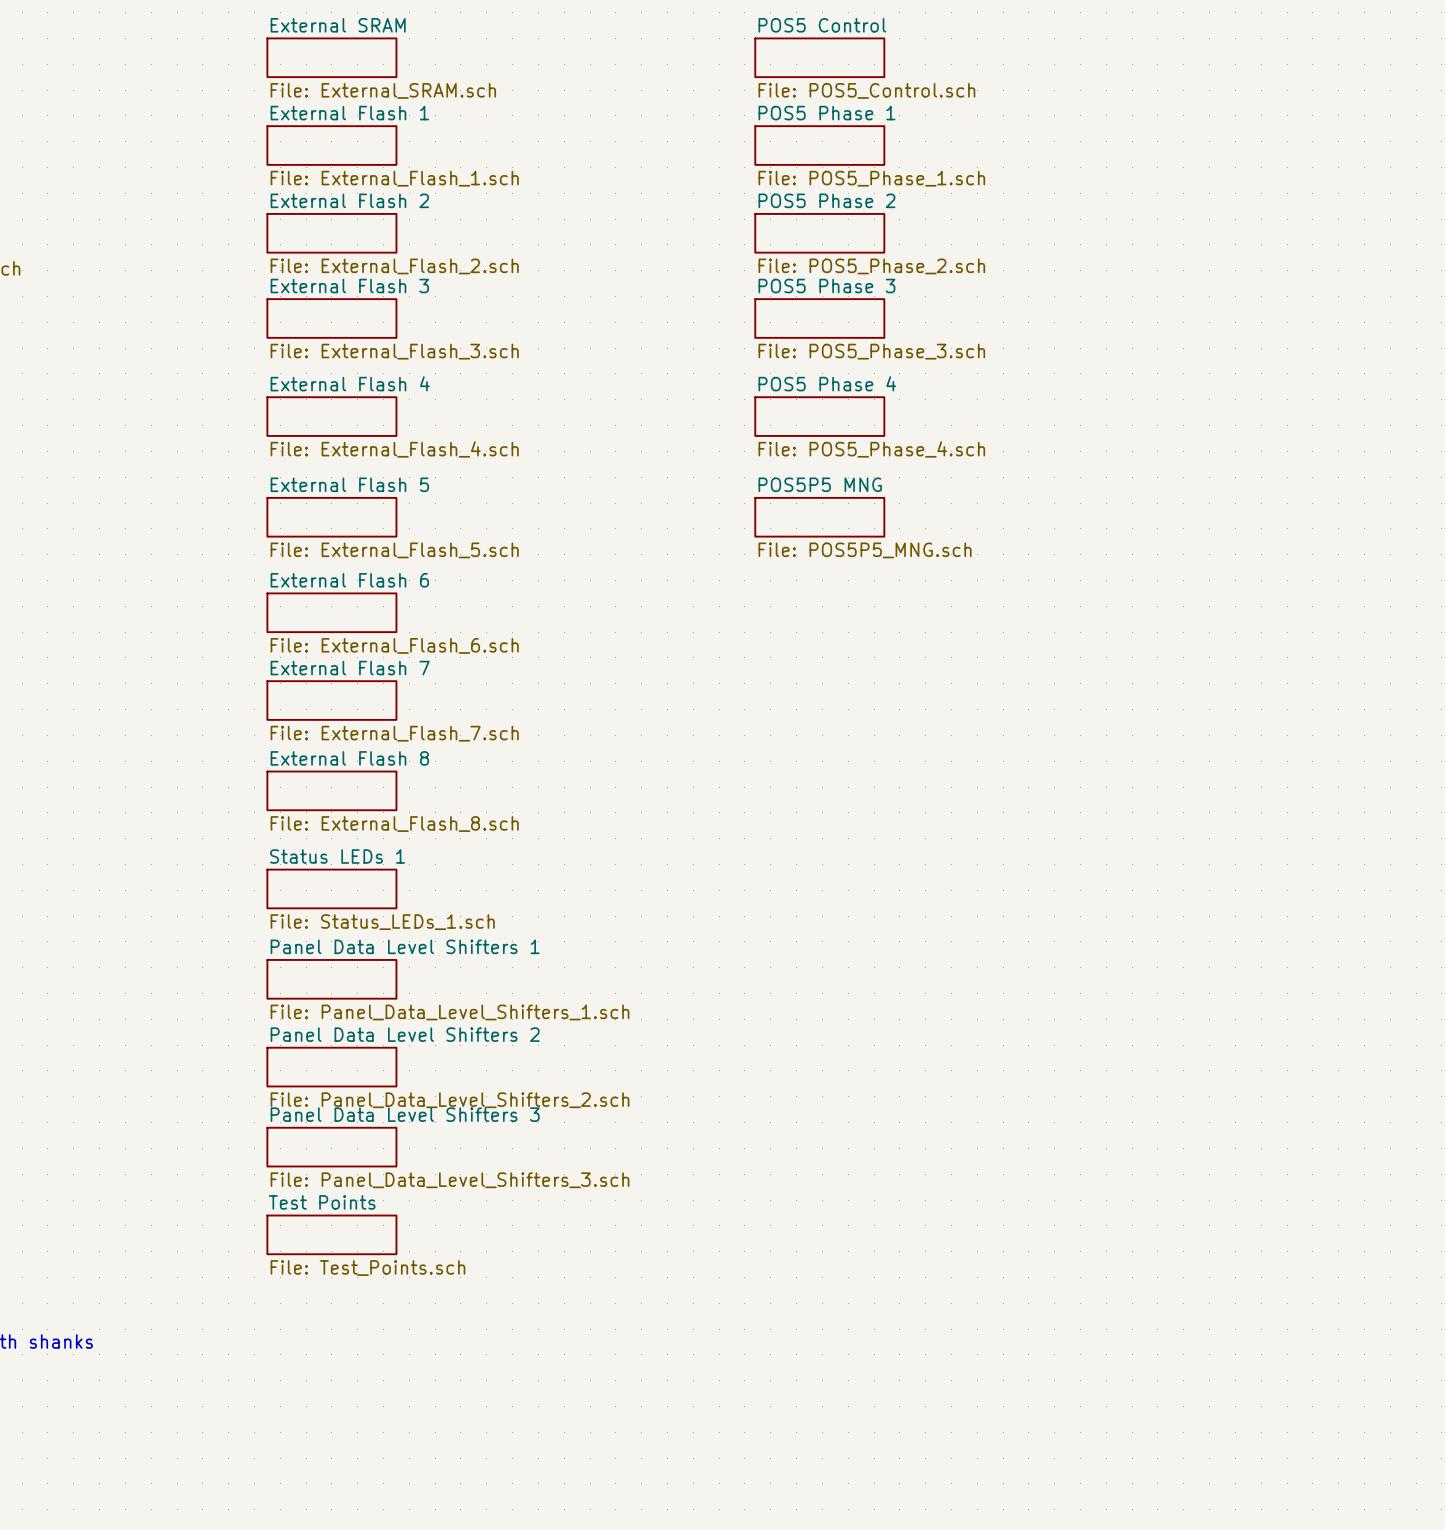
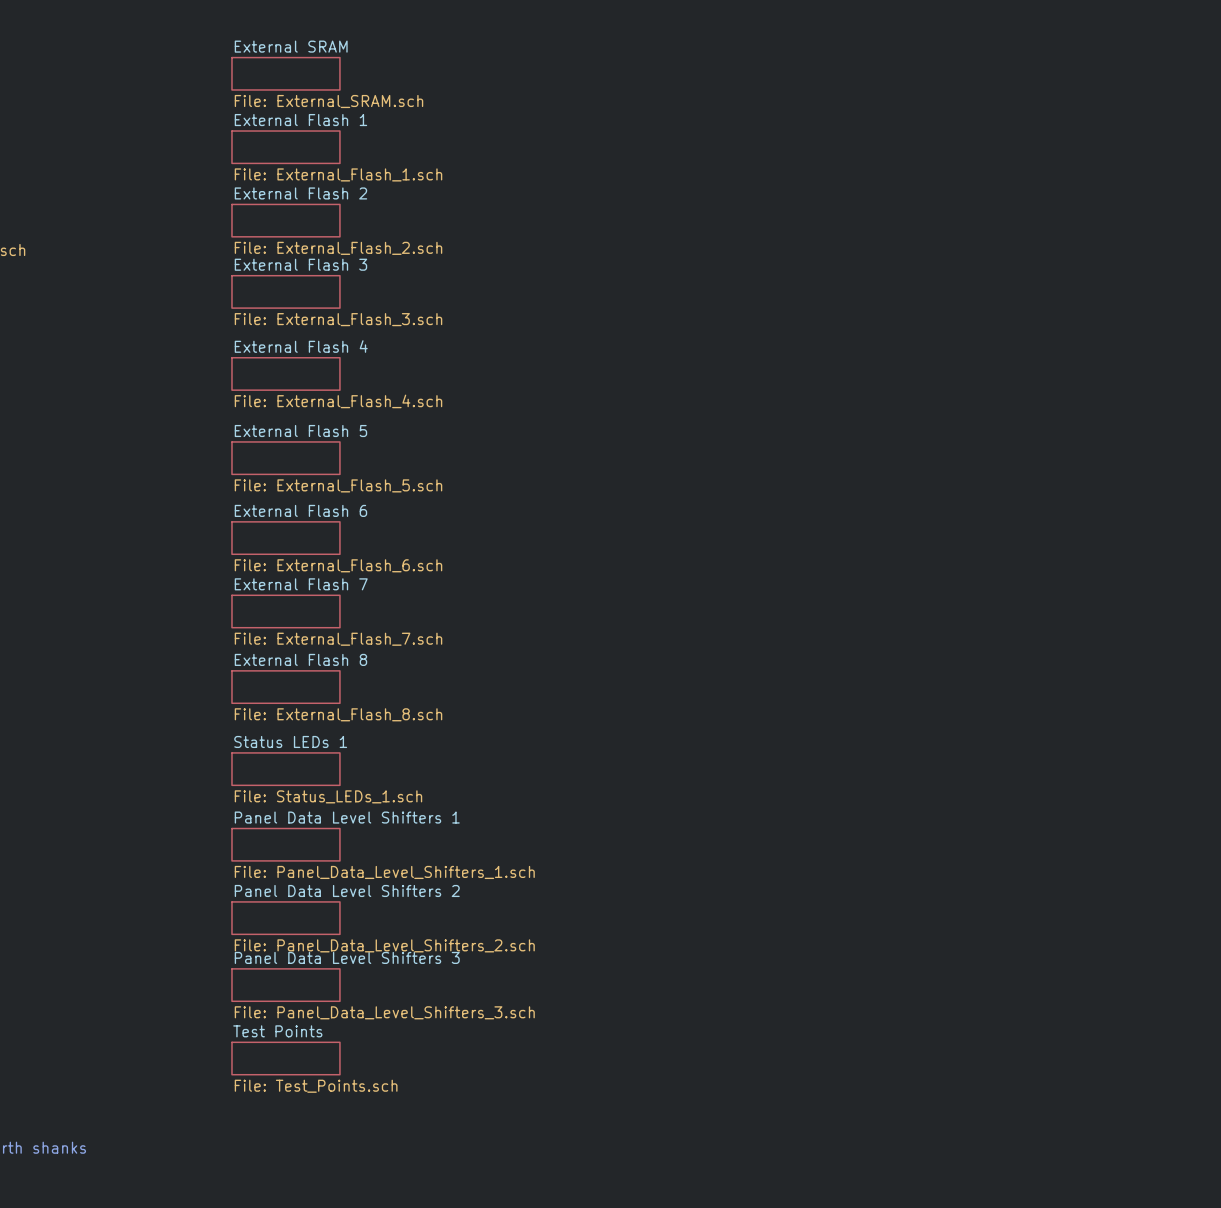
sheet POS5 Control: File: POS5_Control.sch (819, 57) -> none
sheet POS5 Phase 1: File: POS5_Phase_1.sch (819, 145) -> none
sheet POS5 Phase 2: File: POS5_Phase_2.sch (819, 233) -> none
sheet POS5 Phase 3: File: POS5_Phase_3.sch (819, 318) -> none
sheet POS5 Phase 4: File: POS5_Phase_4.sch (819, 416) -> none
sheet POS5P5 MNG: File: POS5P5_MNG.sch (819, 517) -> none

